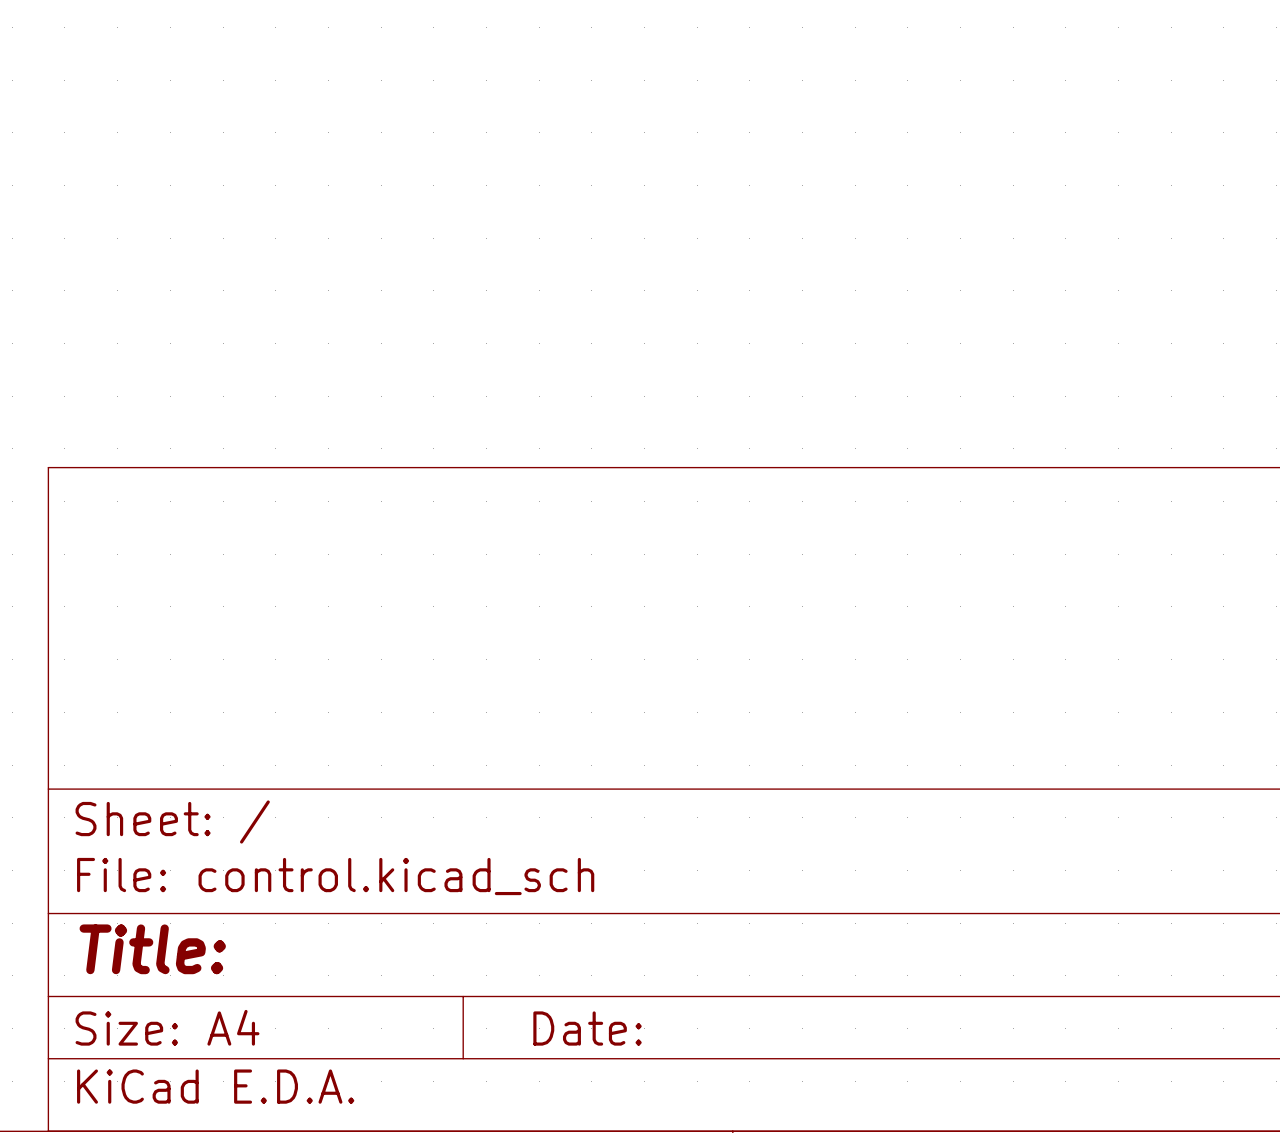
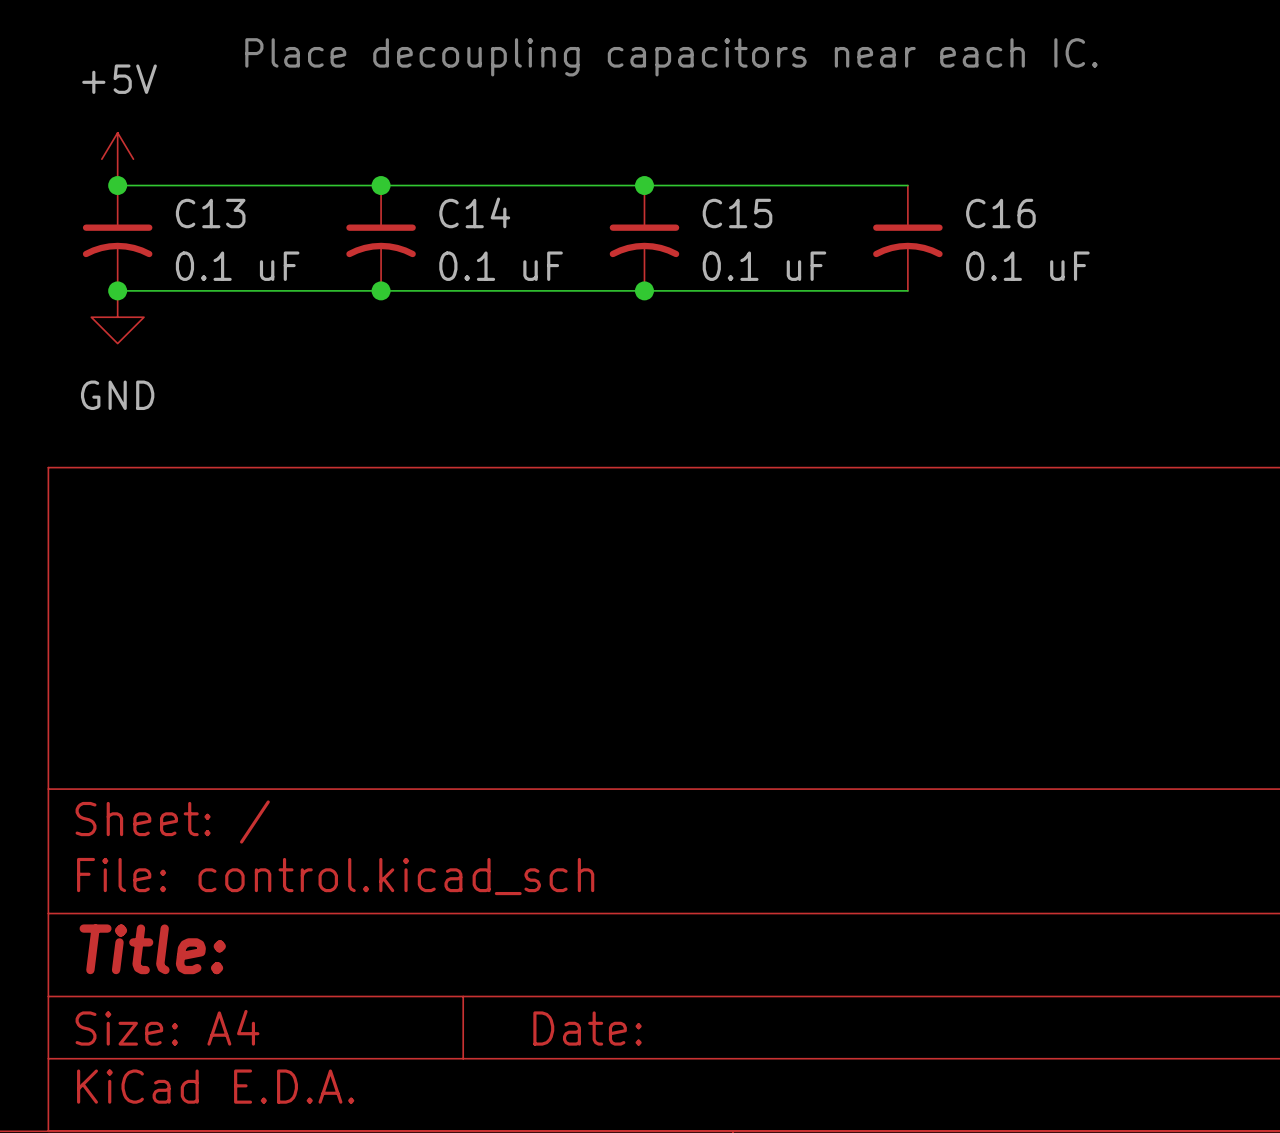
text: none -> Place decoupling capacitors near each IC. (671, 57)
power symbol: none -> +5V (117, 159)
wire: none -> (117, 185) (907, 185)
junction: none -> (117, 185)
junction: none -> (381, 185)
junction: none -> (644, 185)
C13: none -> 0.1 uF (117, 238)
C14: none -> 0.1 uF (381, 238)
C15: none -> 0.1 uF (644, 238)
C16: none -> 0.1 uF (907, 238)
wire: none -> (117, 290) (907, 290)
junction: none -> (117, 290)
junction: none -> (381, 290)
junction: none -> (644, 290)
power symbol: none -> GND (117, 317)

